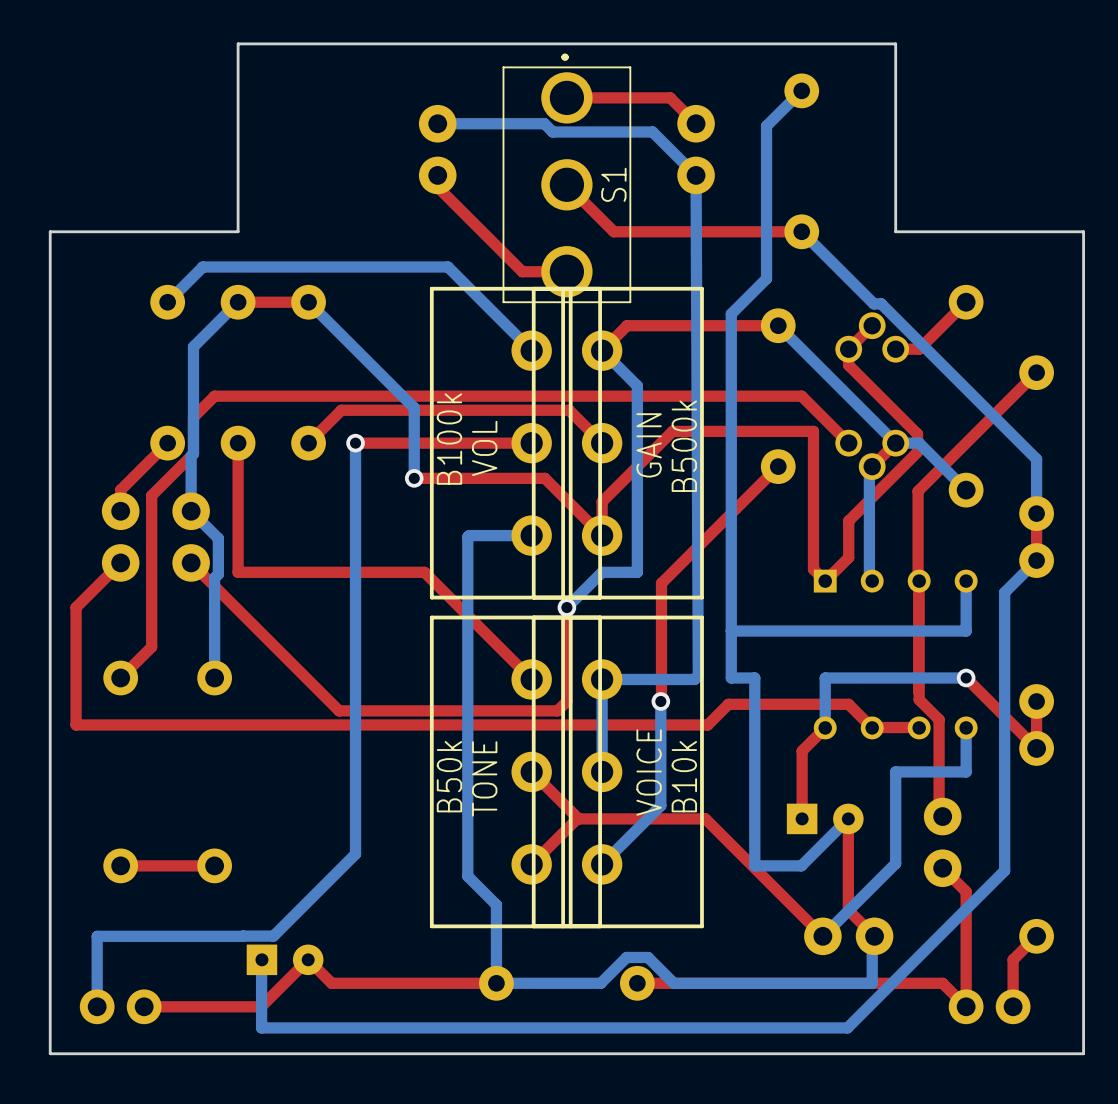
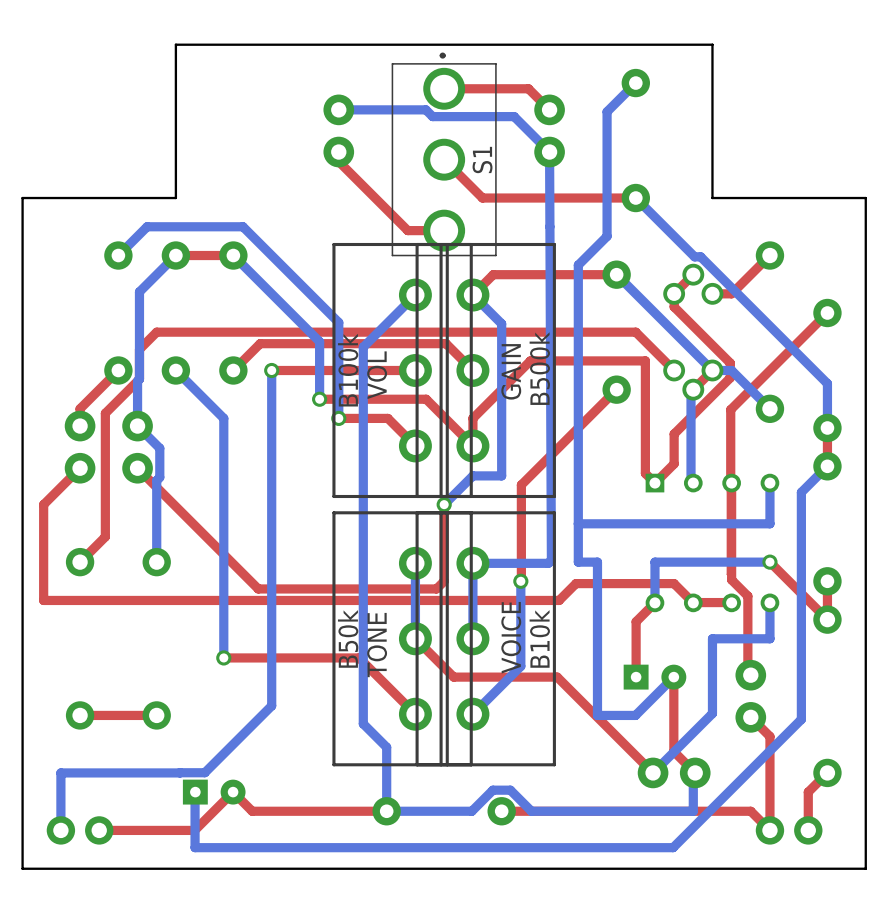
bottom track: (320, 267) (447, 267) (531, 350) -> (242, 226) (338, 322) (338, 418)
top track: (238, 443) (238, 572) (424, 572) (531, 679) -> none
bottom track: none -> (175, 370) (223, 418) (223, 657)
top track: none -> (338, 418) (387, 418) (415, 445)
via: none -> (338, 418)
bottom track: (531, 535) (467, 537) -> (415, 295) (363, 347) (363, 447)
bottom track: none -> (415, 563) (415, 638)
via: none -> (223, 657)
top track: (578, 818) (531, 864) -> (223, 657) (359, 657) (415, 714)

